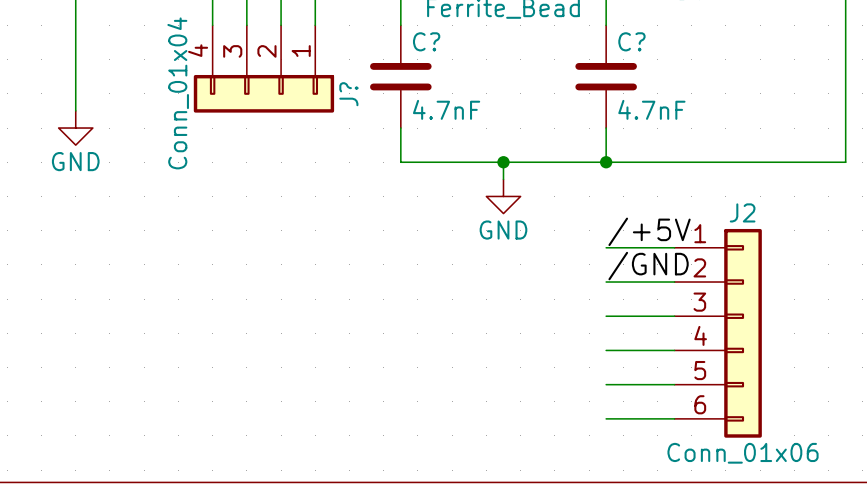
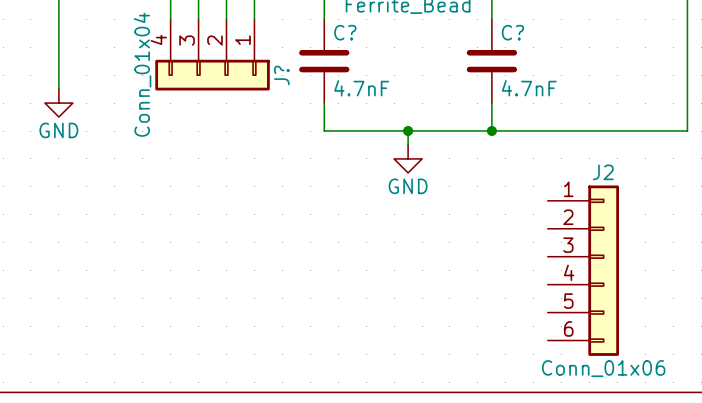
label: /+5V (649, 231) -> none
wire: (606, 247) (674, 247) -> none
label: /GND (648, 266) -> none
wire: (606, 282) (674, 282) -> none
wire: (606, 316) (674, 316) -> none
wire: (606, 350) (674, 350) -> none
wire: (606, 384) (674, 384) -> none
wire: (606, 418) (674, 418) -> none

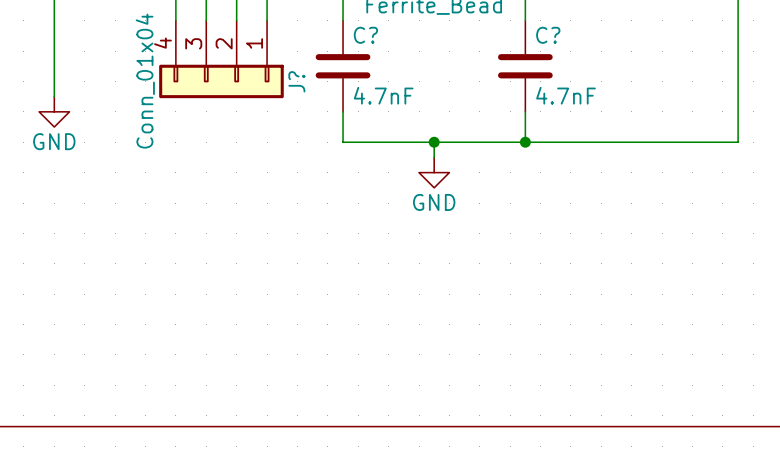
J2: Conn_01x06 (583, 270) -> none

